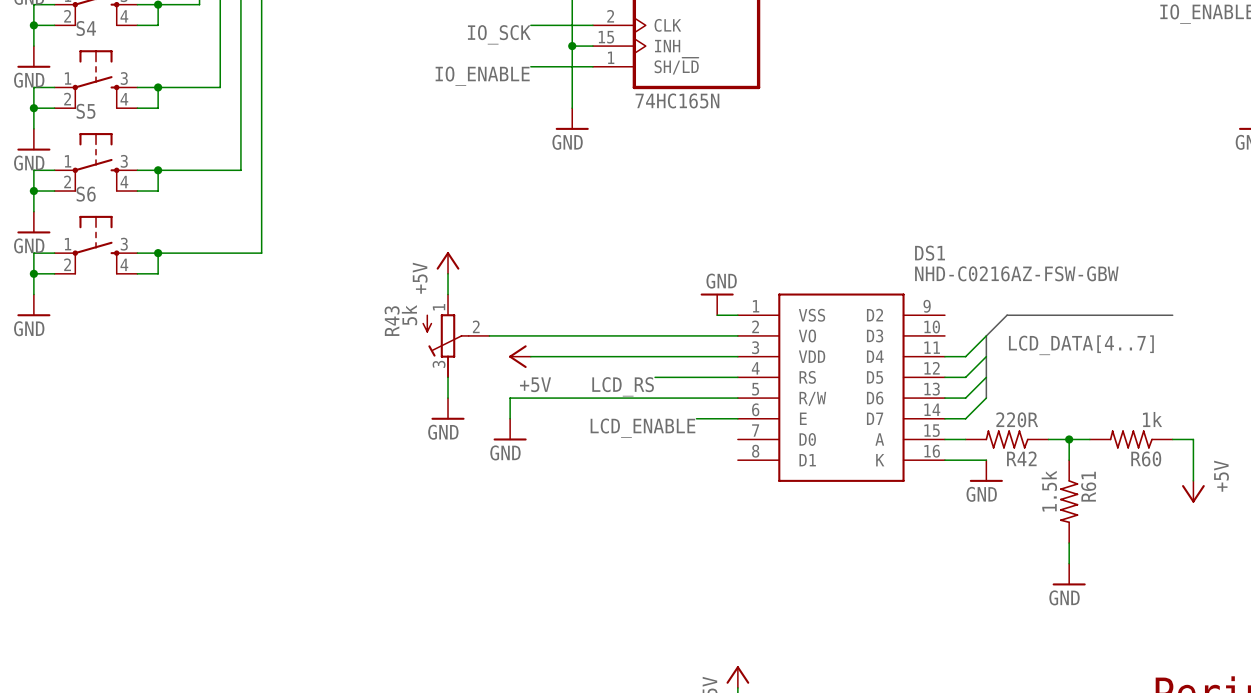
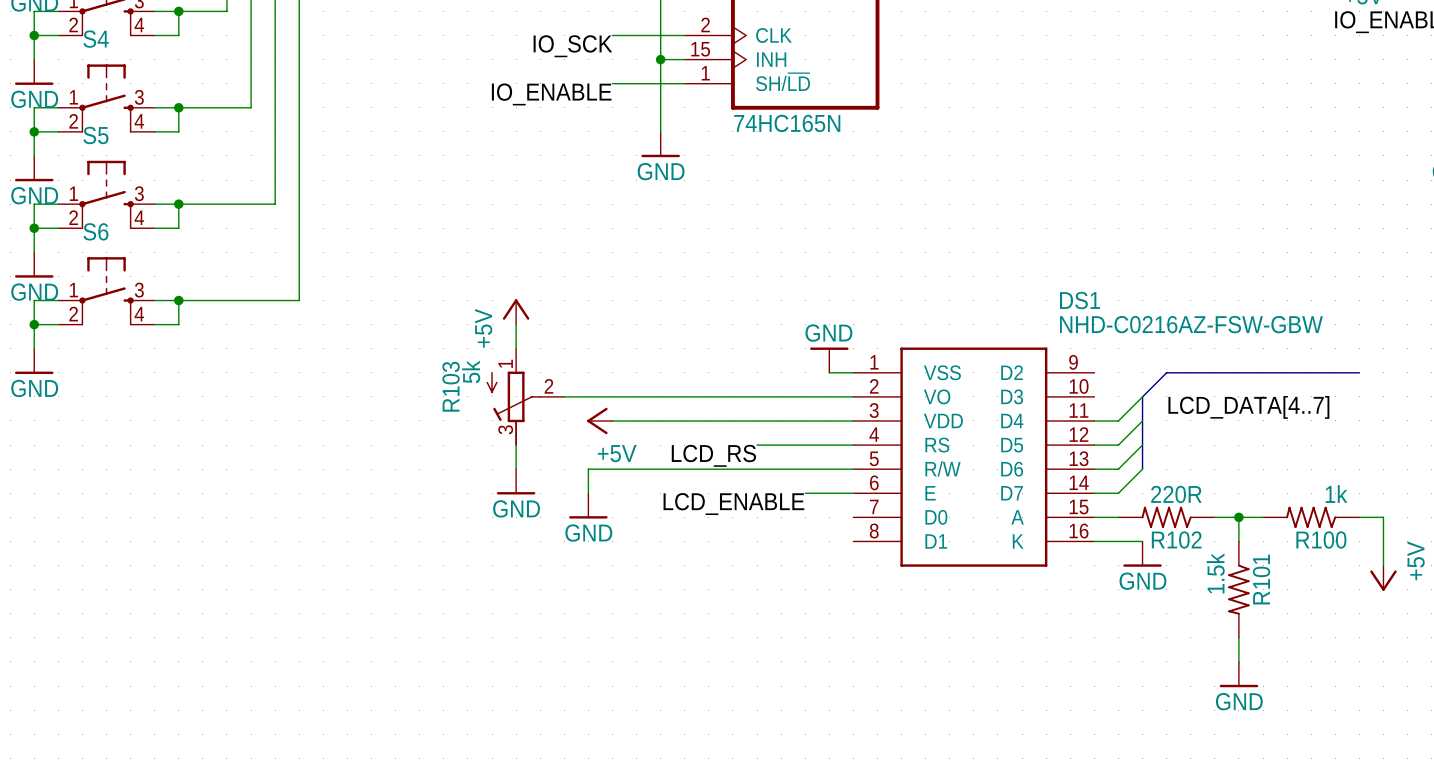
R43 name: R43 (392, 321) -> R103 (451, 386)
R42 name: R42 (1021, 458) -> R102 (1176, 540)
R60 name: R60 (1146, 458) -> R100 (1321, 540)
R61 name: R61 (1088, 486) -> R101 (1261, 579)

